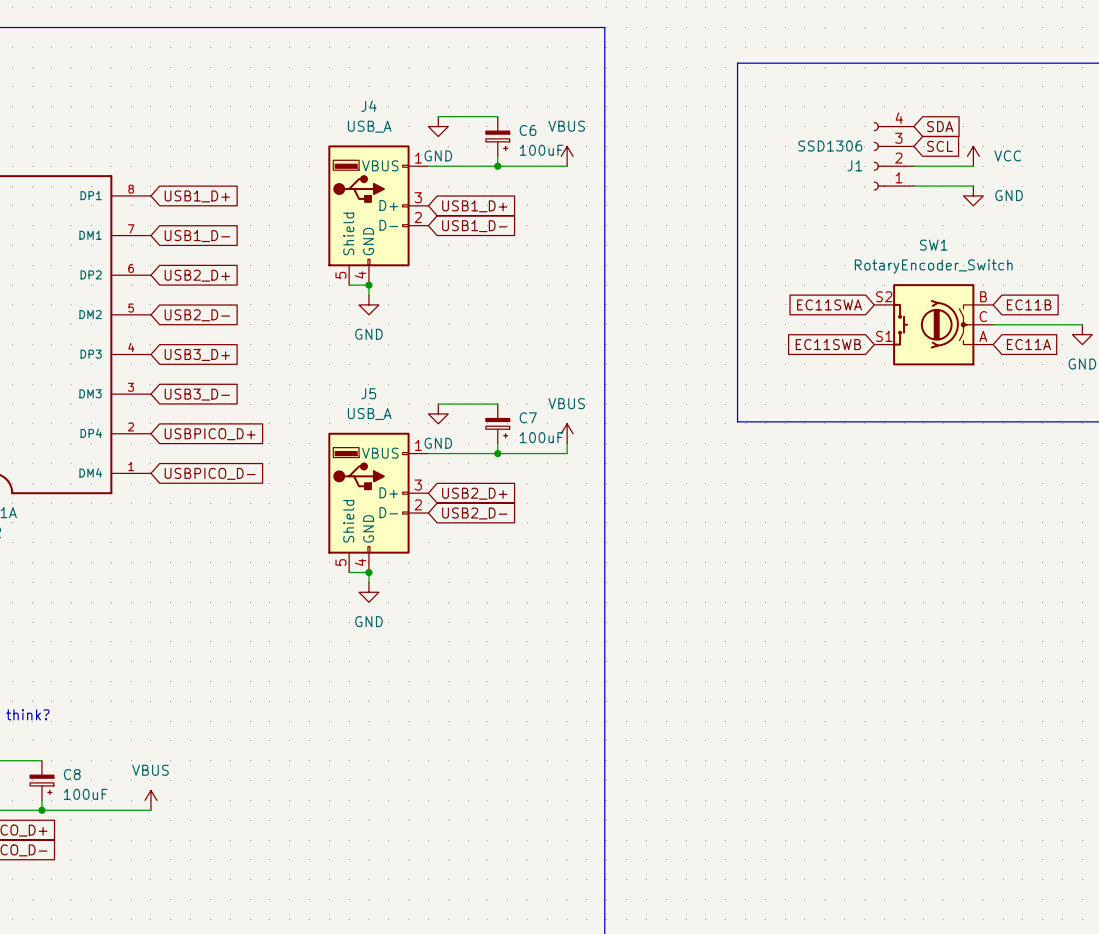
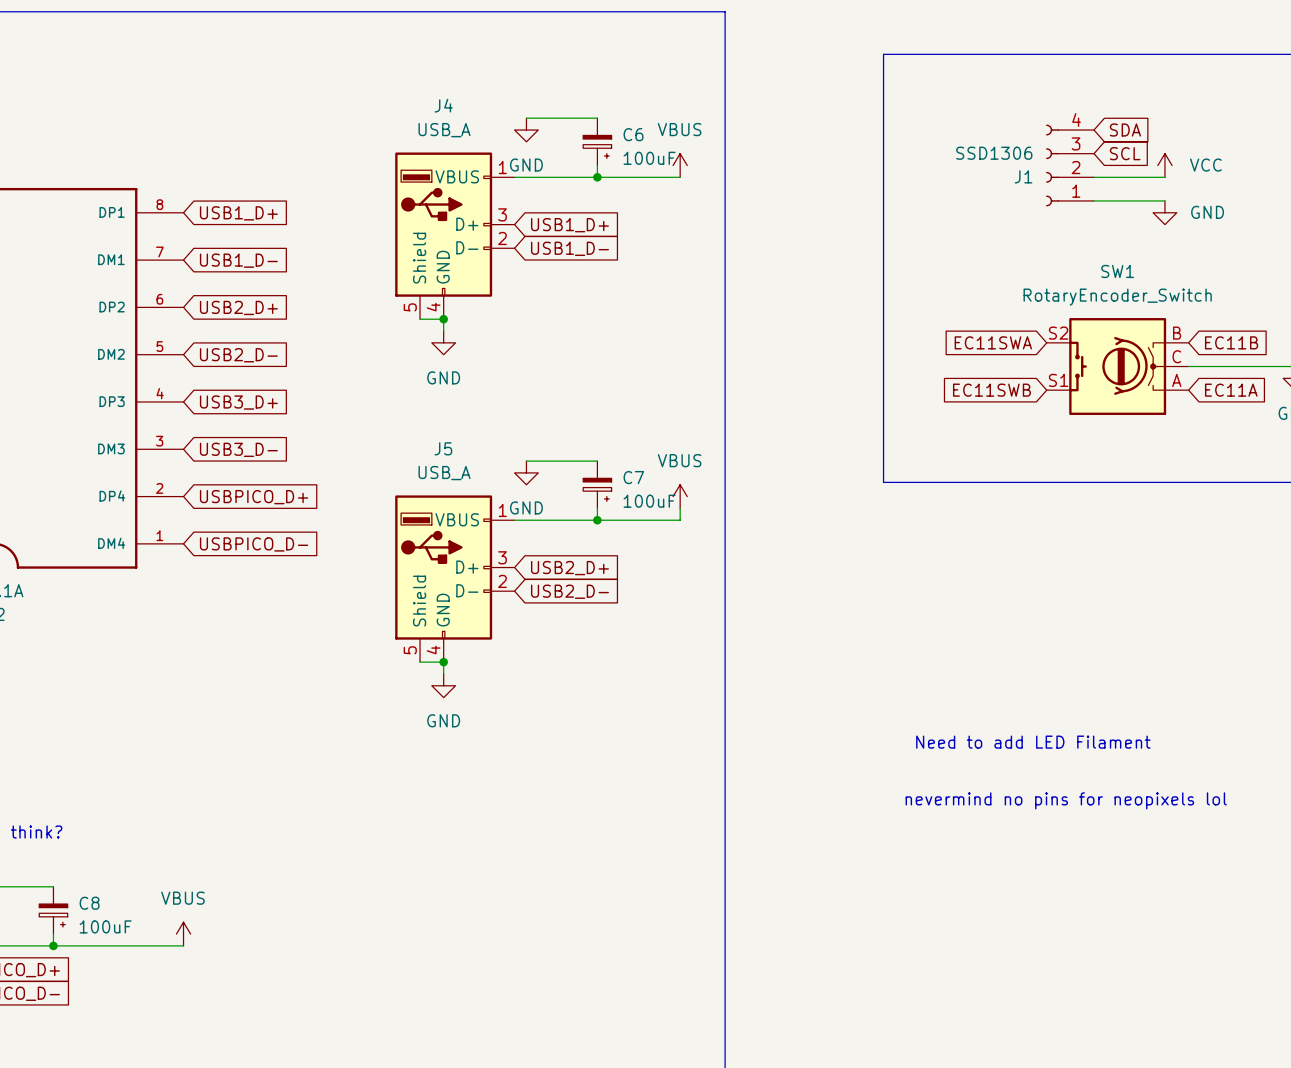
text: none -> Need to add LED Filament (1033, 742)
text: none -> nevermind no pins for neopixels lol (1066, 800)

